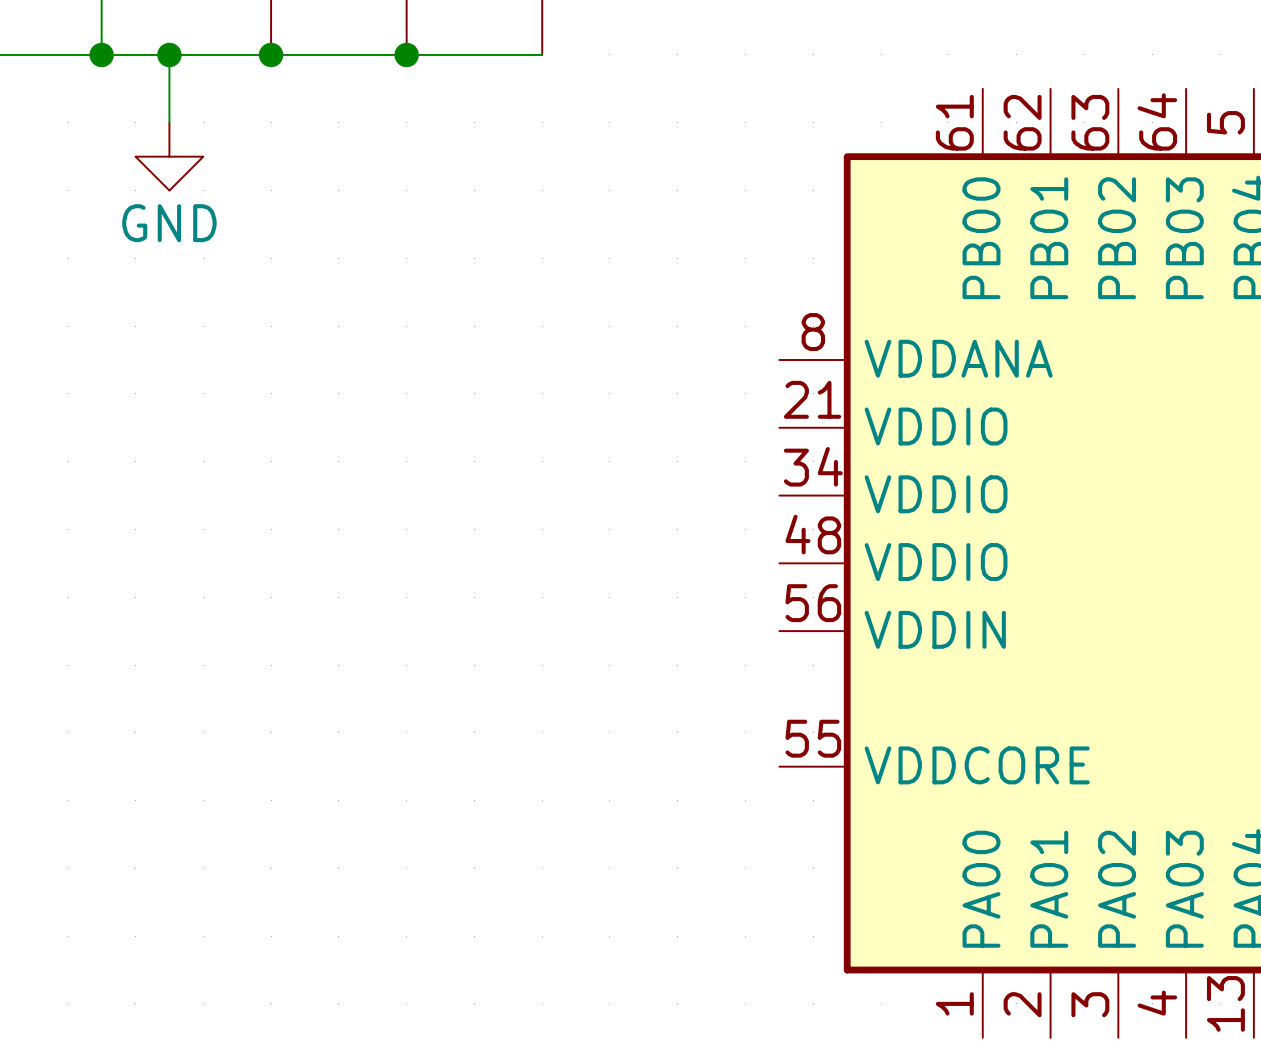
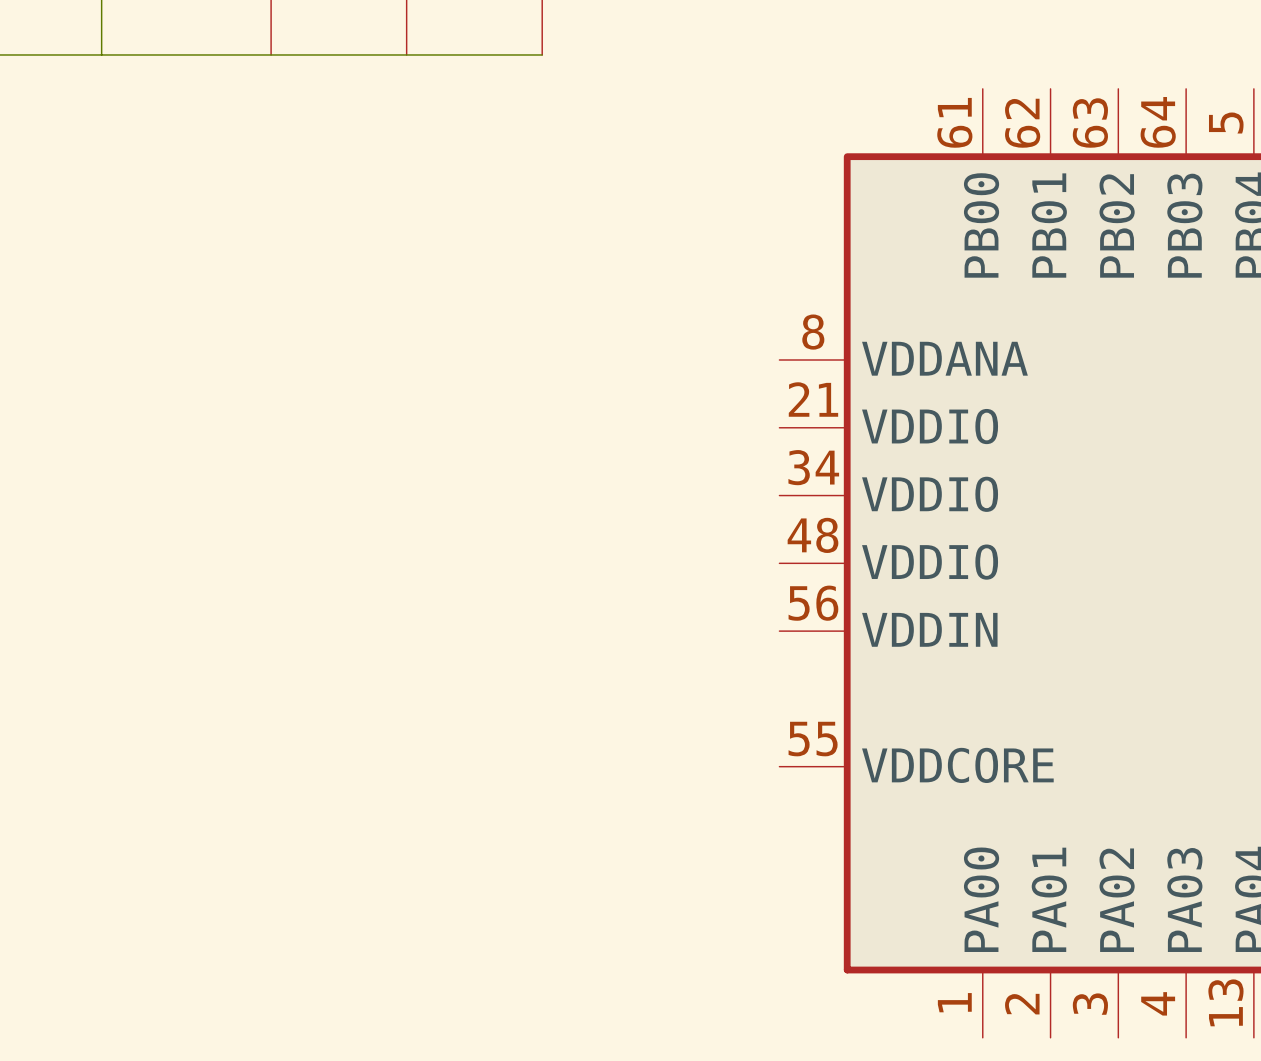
junction: (101, 54) -> none
wire: (169, 54) (169, 122) -> none
junction: (169, 54) -> none
junction: (271, 54) -> none
junction: (406, 54) -> none
power symbol: GND (169, 156) -> none

